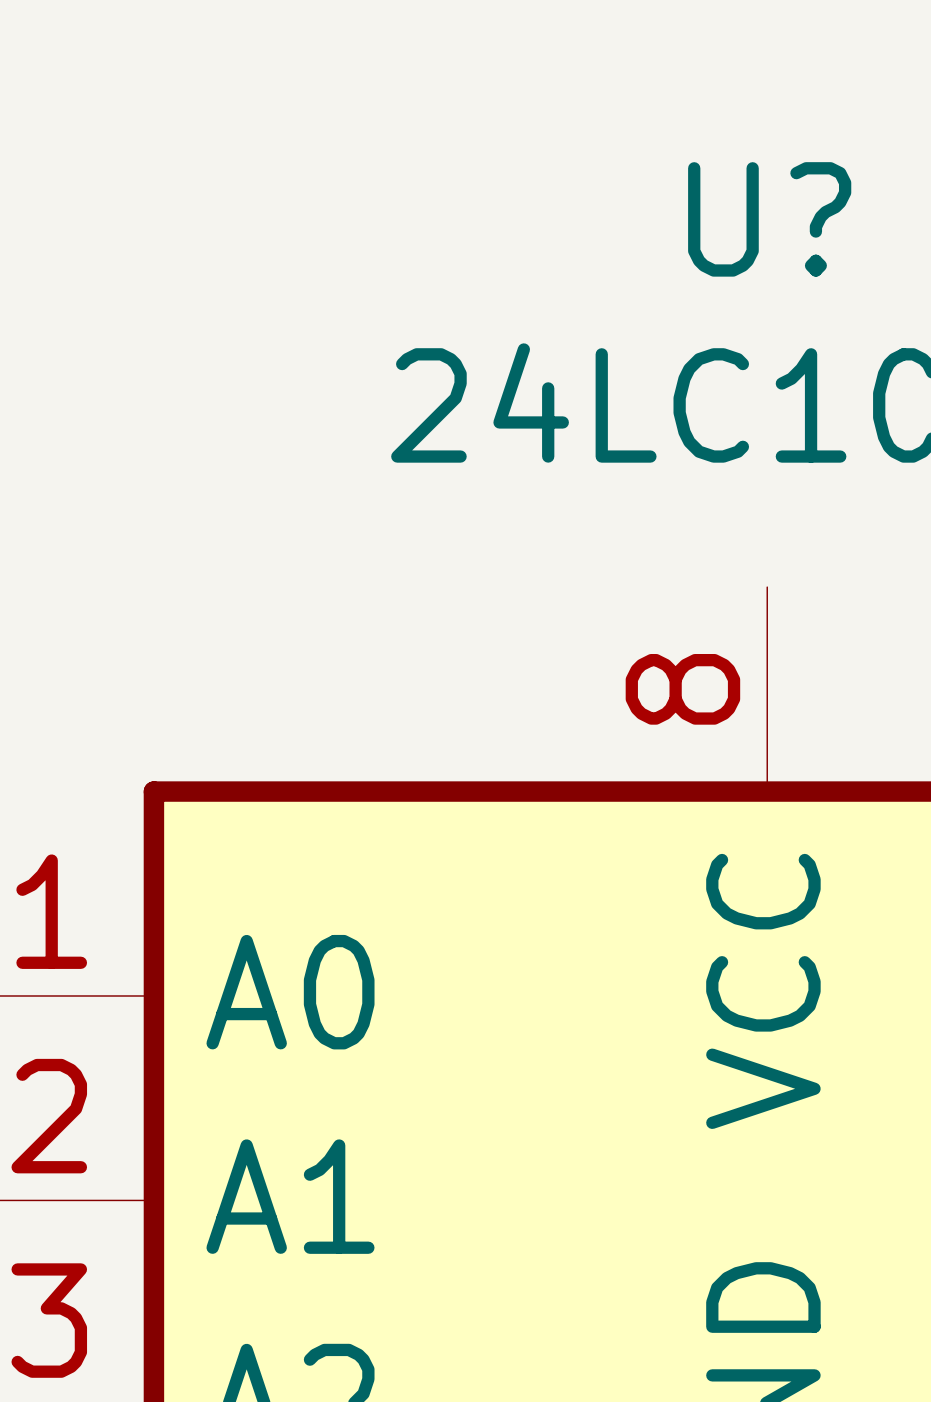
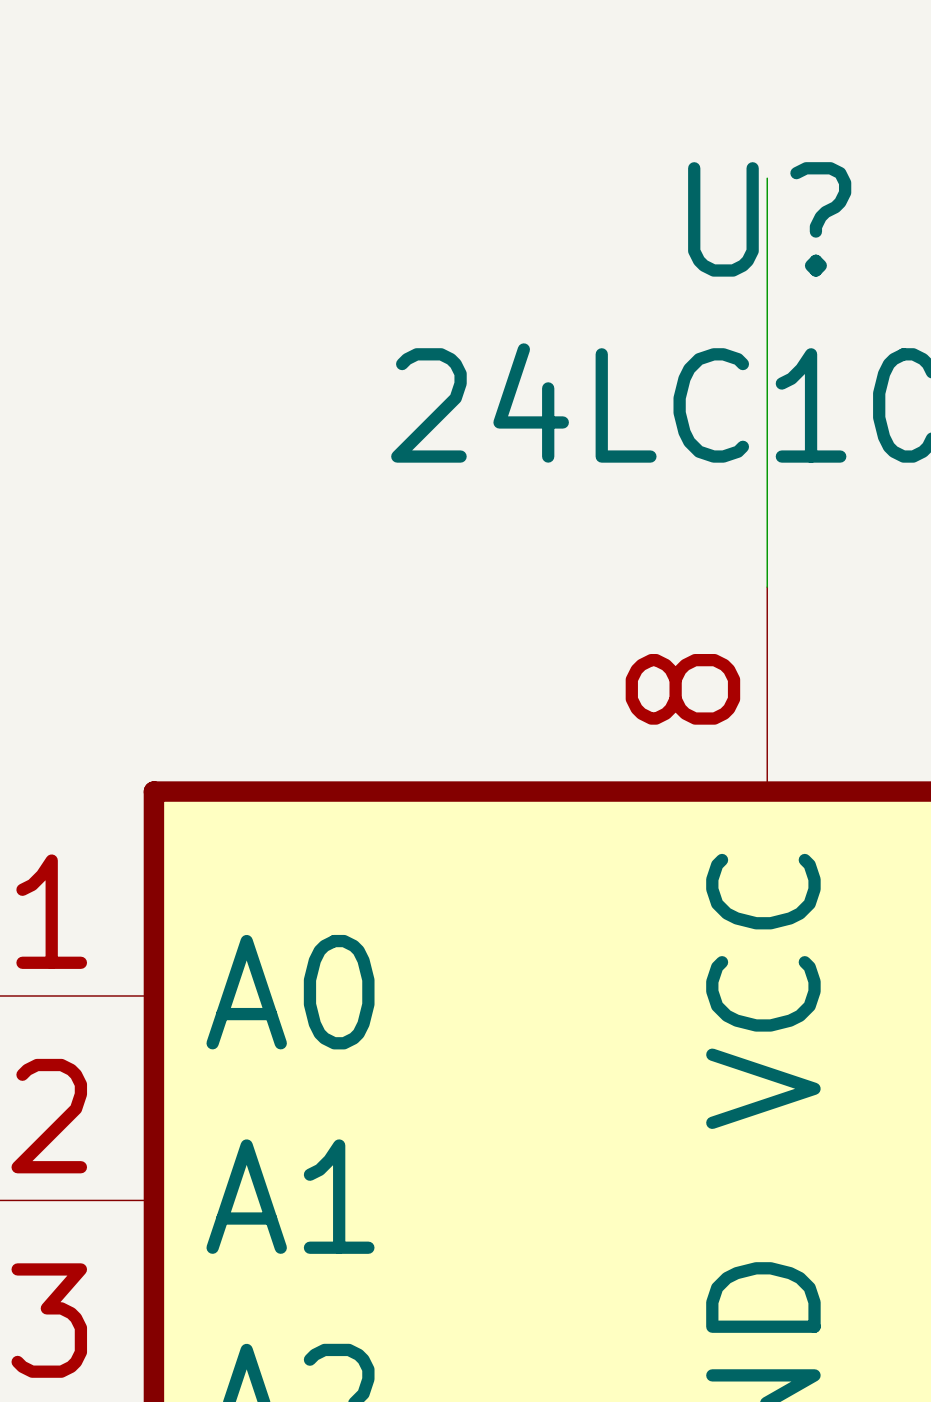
wire: none -> (767, 178) (767, 587)

